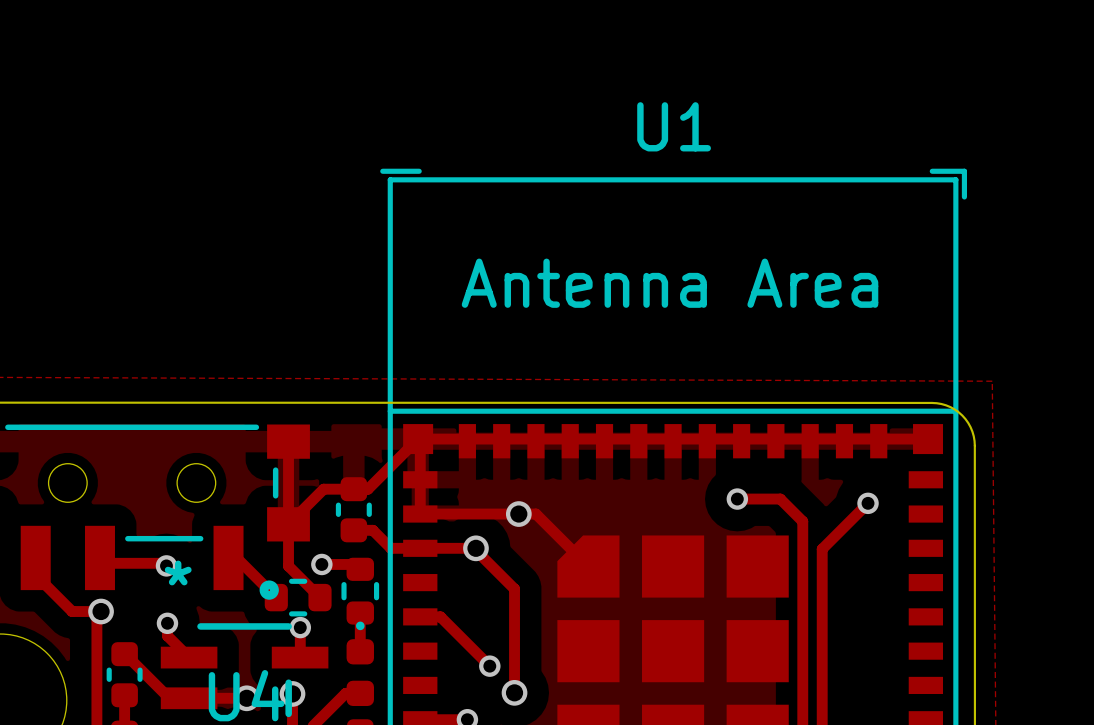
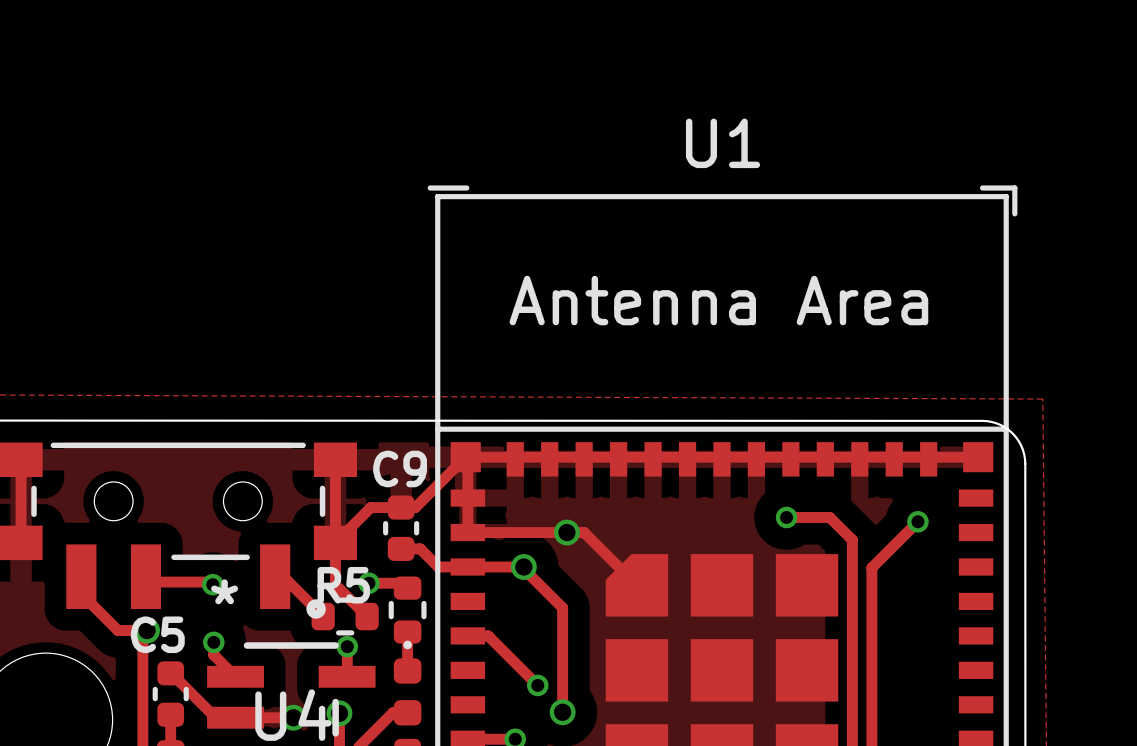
C9 name: none -> C9 (400, 468)
R5 name: none -> R5 (343, 585)
C5 name: none -> C5 (157, 634)

